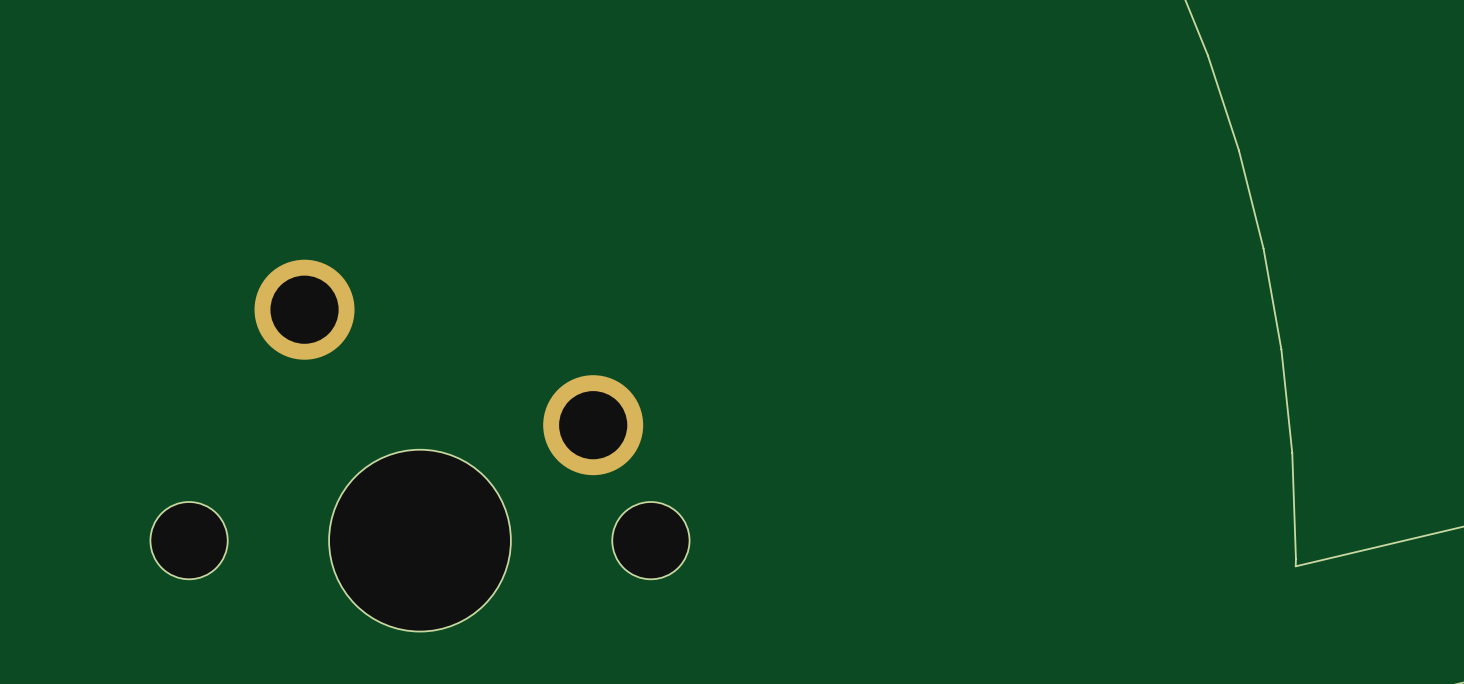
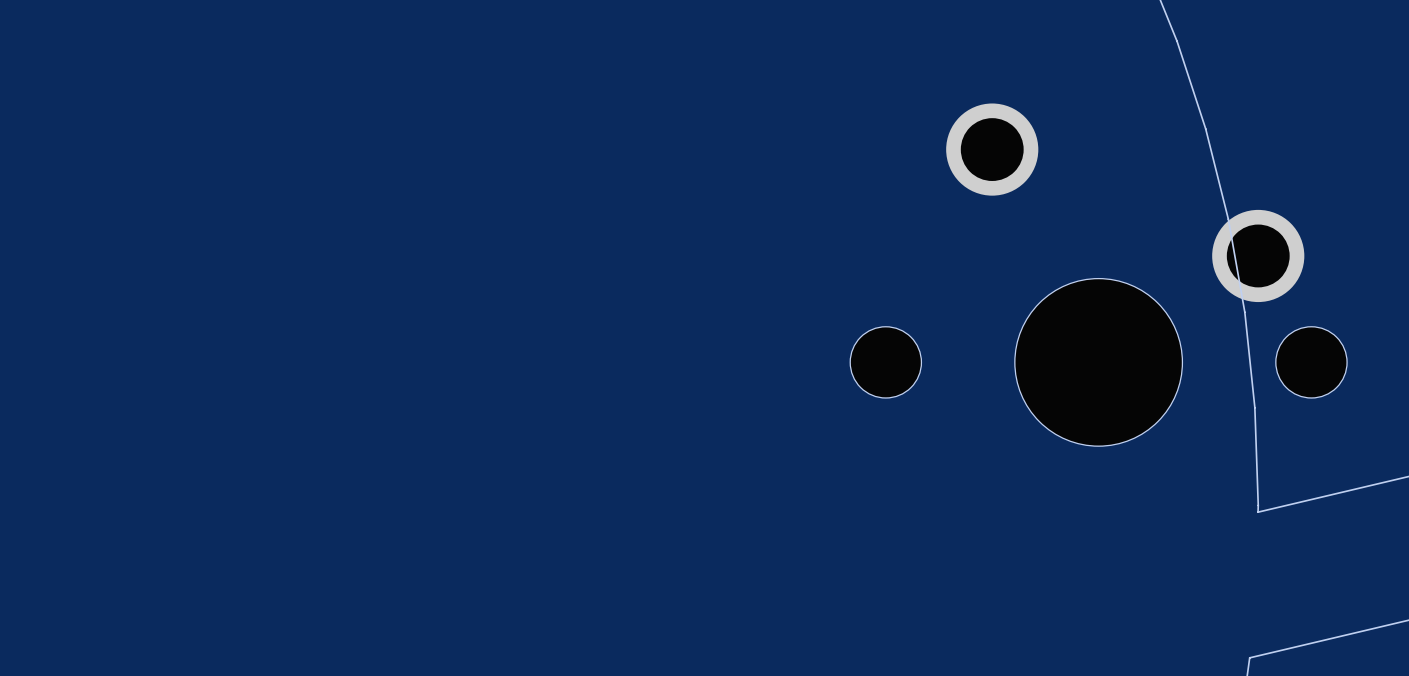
part: none -> (1098, 274)
part: (419, 445) -> none

